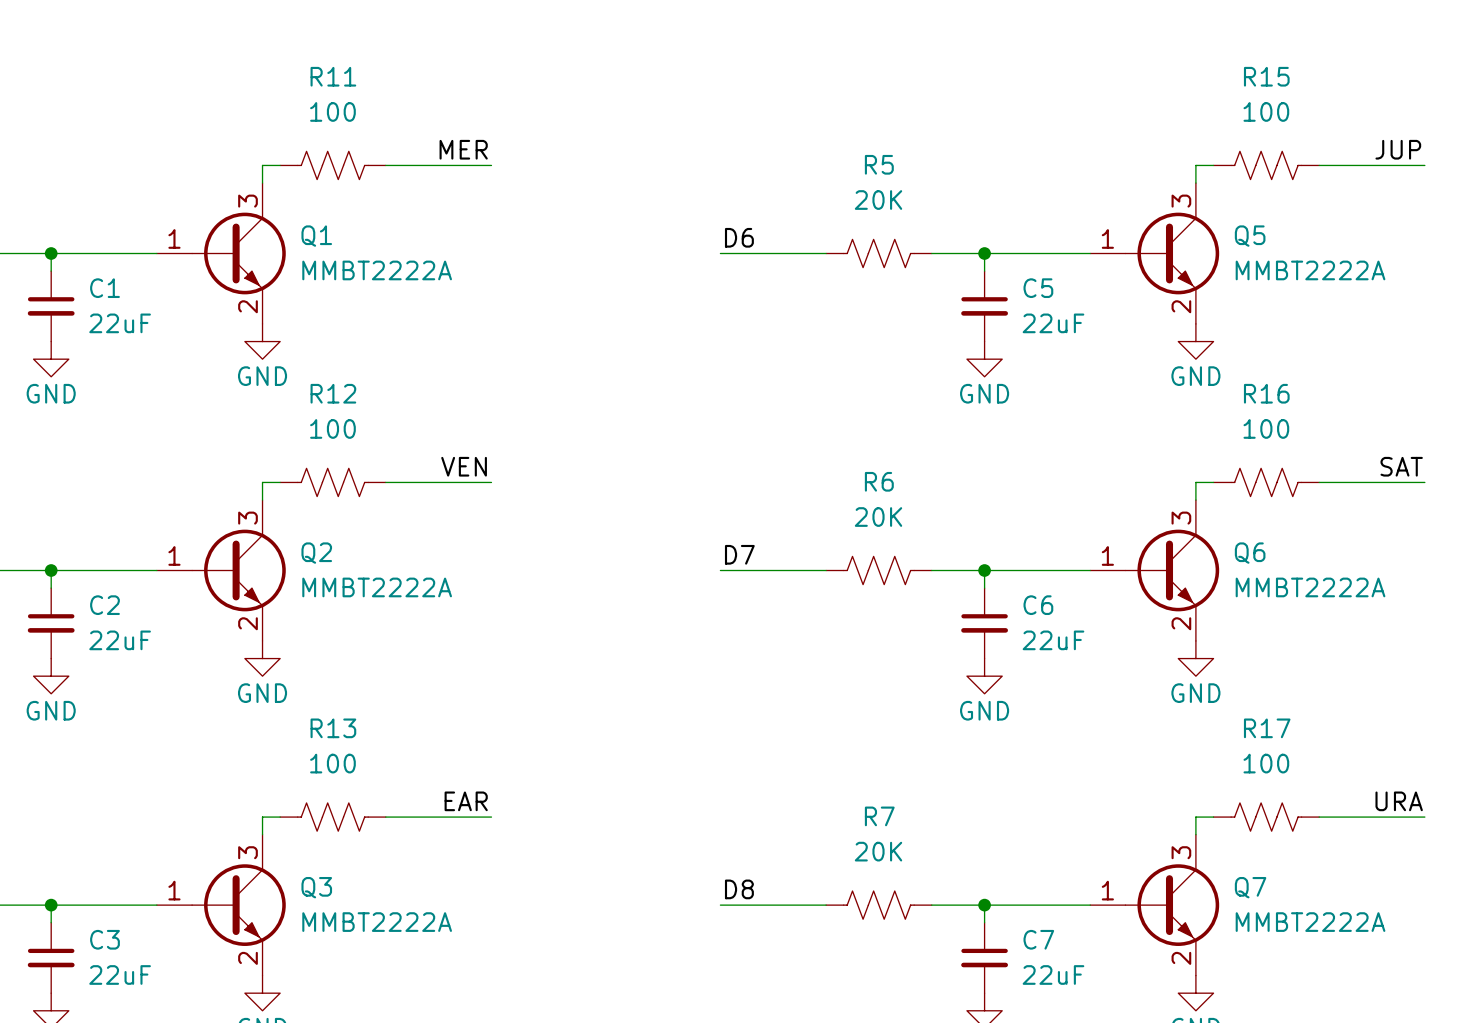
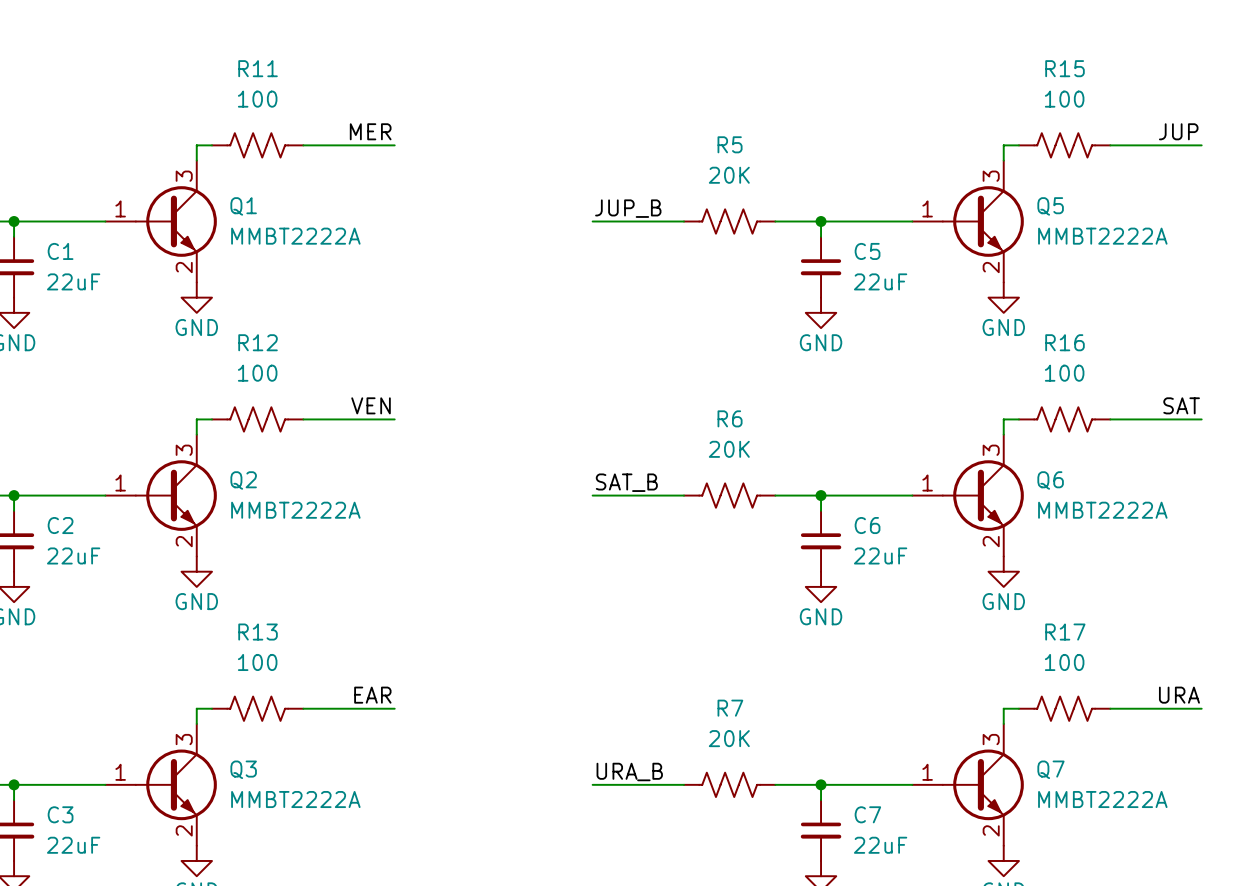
label: D6 (739, 237) -> JUP_B (628, 208)
label: D7 (739, 554) -> SAT_B (626, 482)
label: D8 (739, 889) -> URA_B (629, 771)

